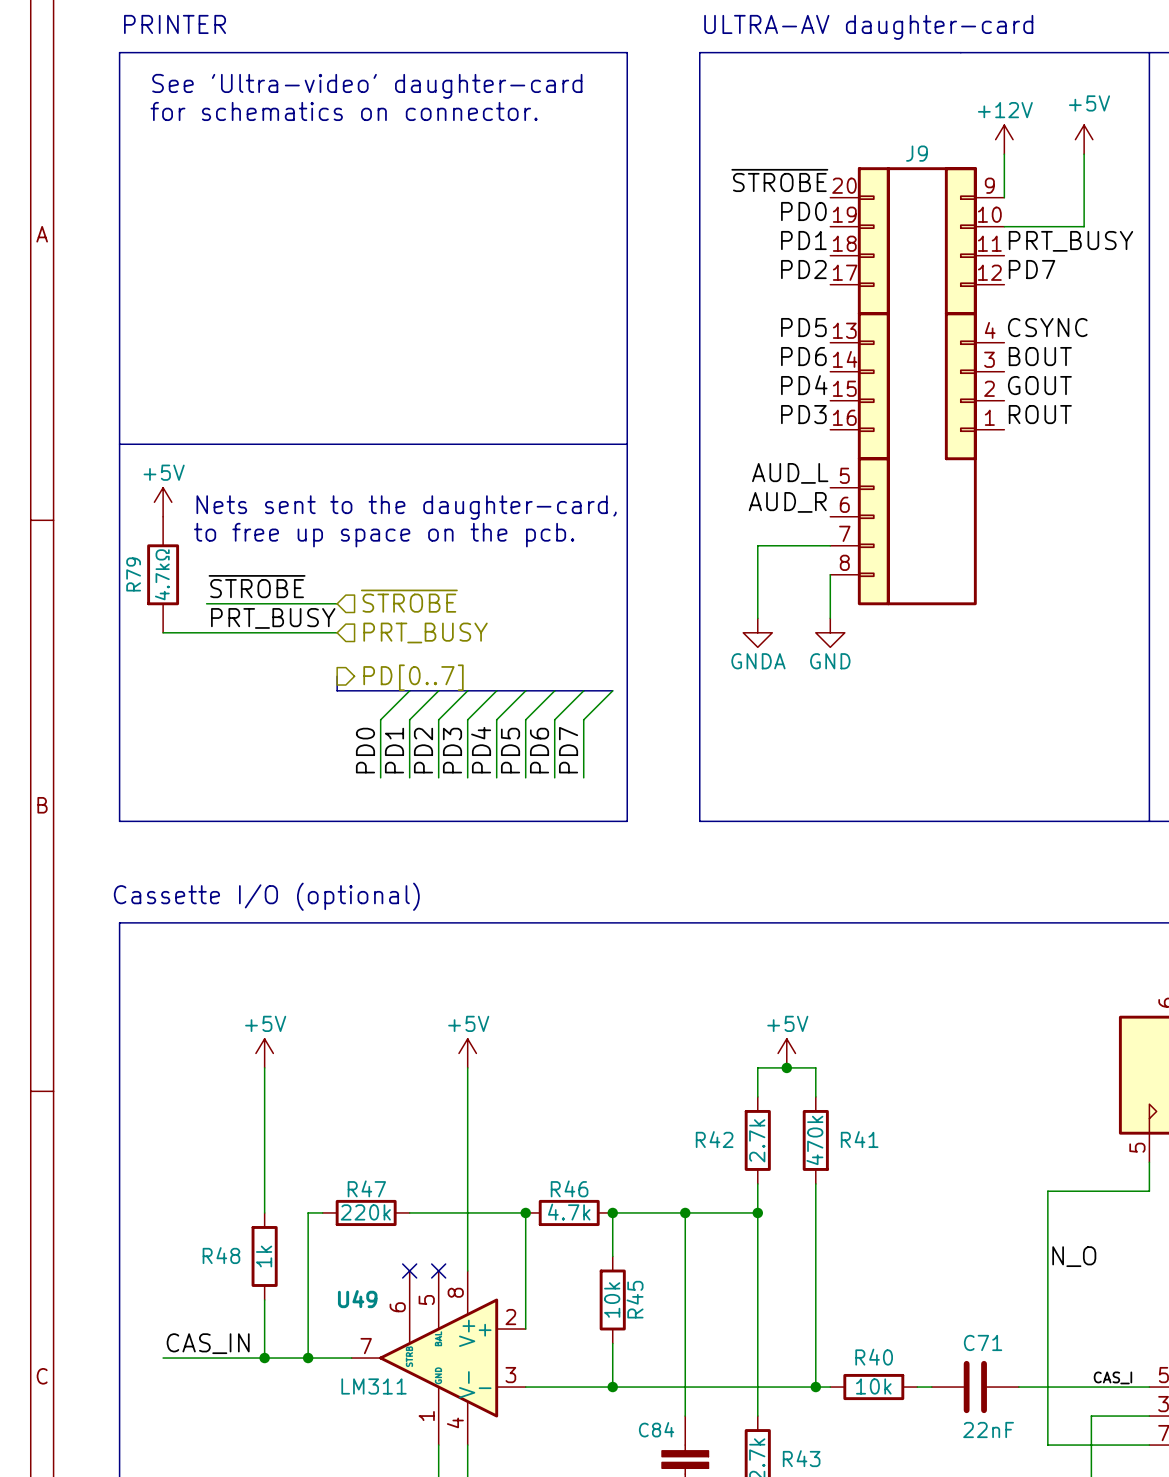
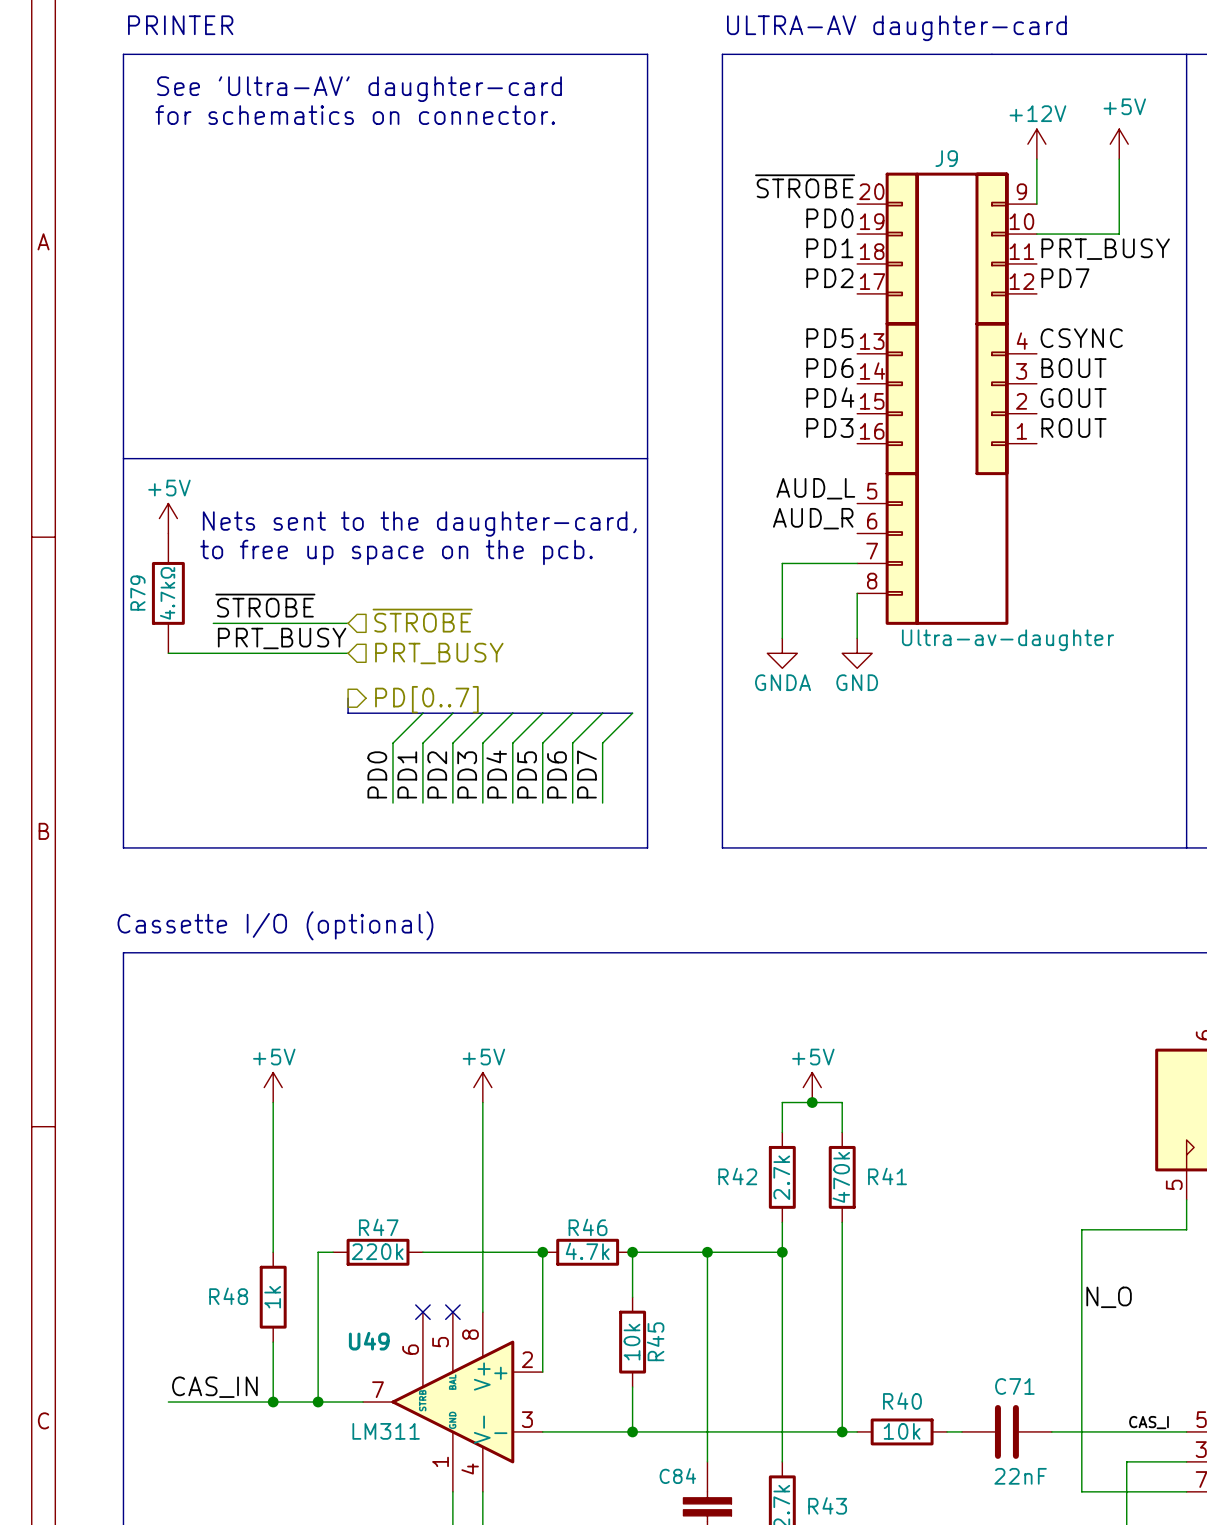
text: See 'Ultra-video' daughter-card (367, 86) -> See 'Ultra-AV' daughter-card (359, 89)
J9 value: none -> Ultra-av-daughter (1008, 640)

